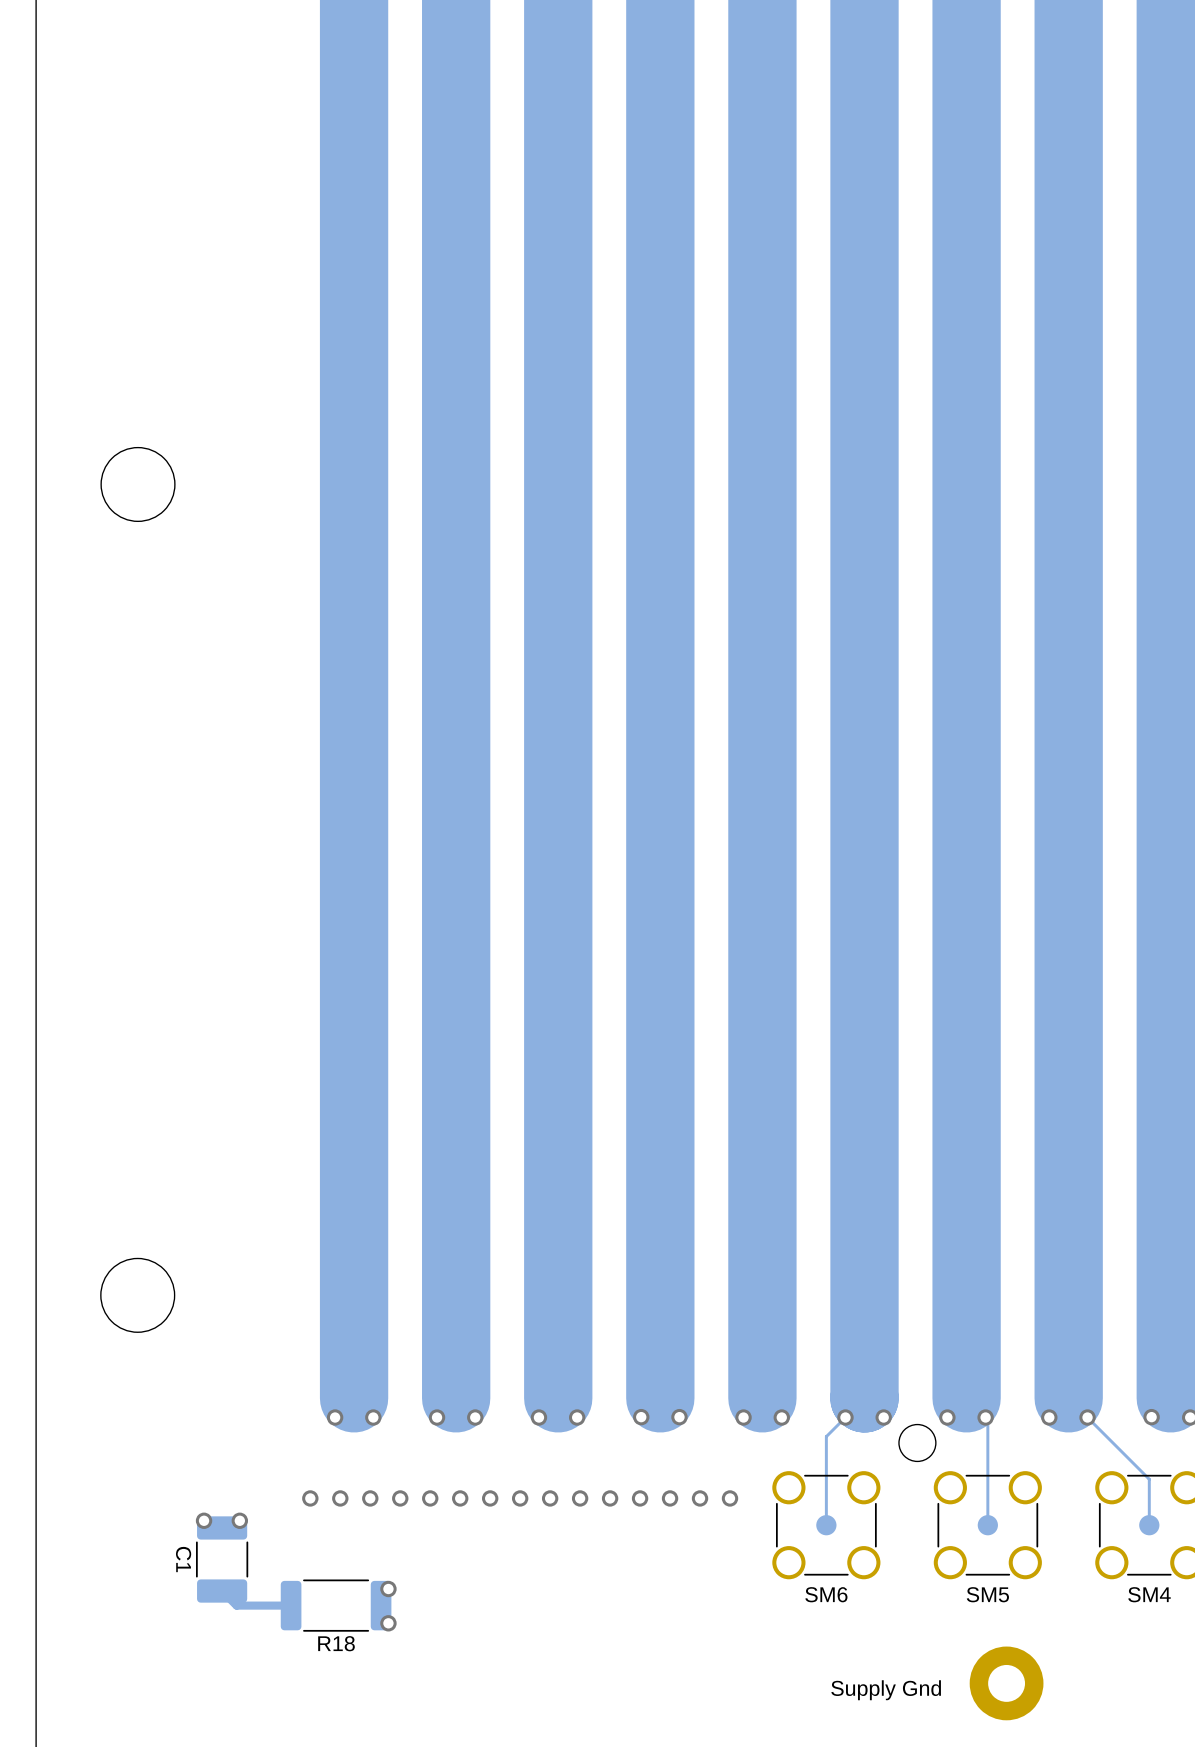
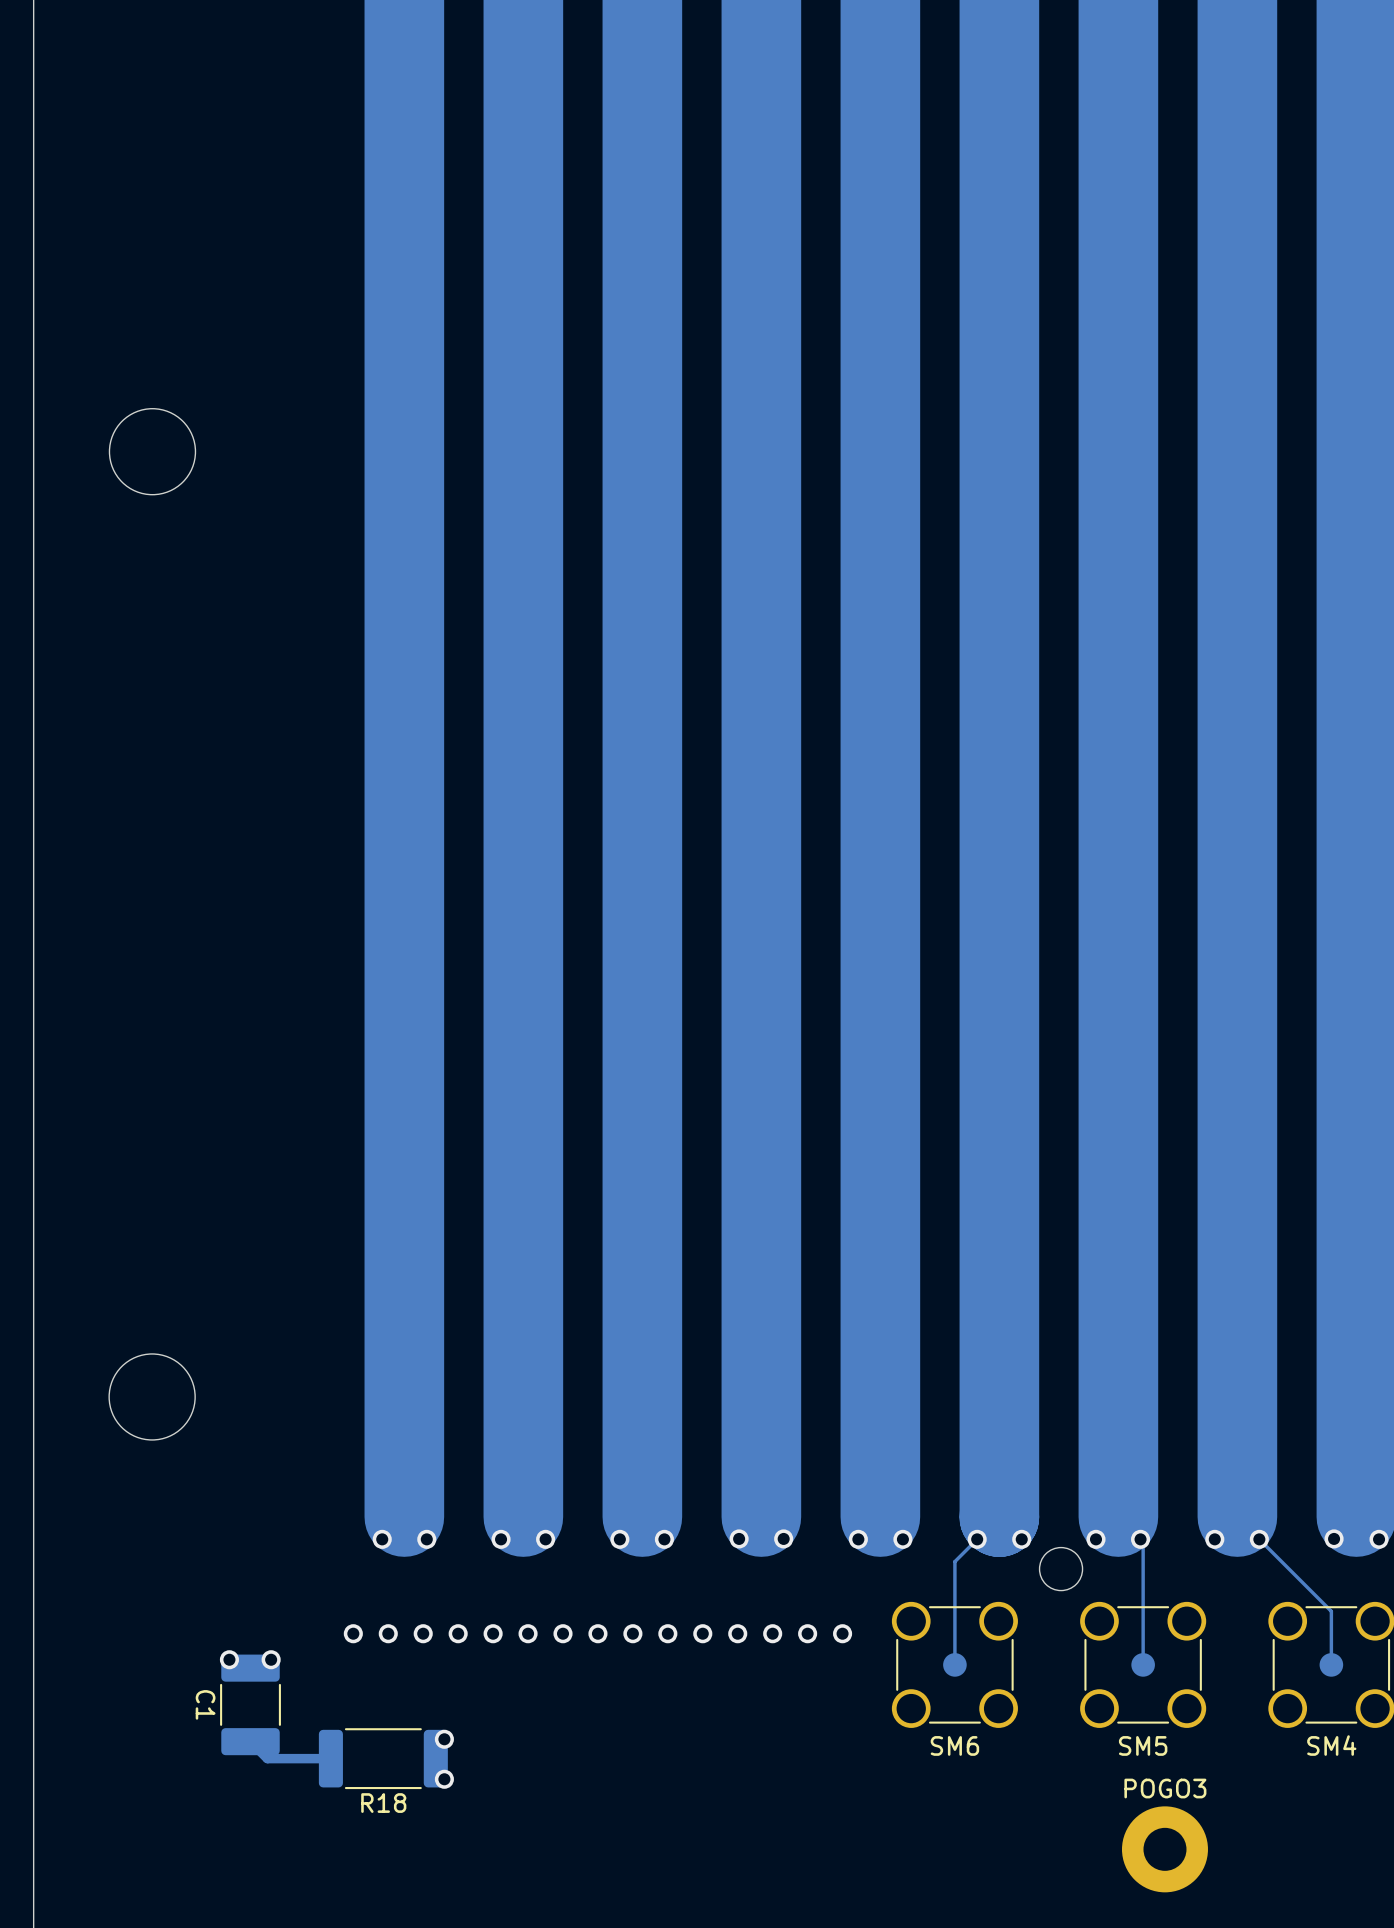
POGO3 name: none -> POGO3 (1165, 1788)
text: Supply Gnd (886, 1690) -> none

